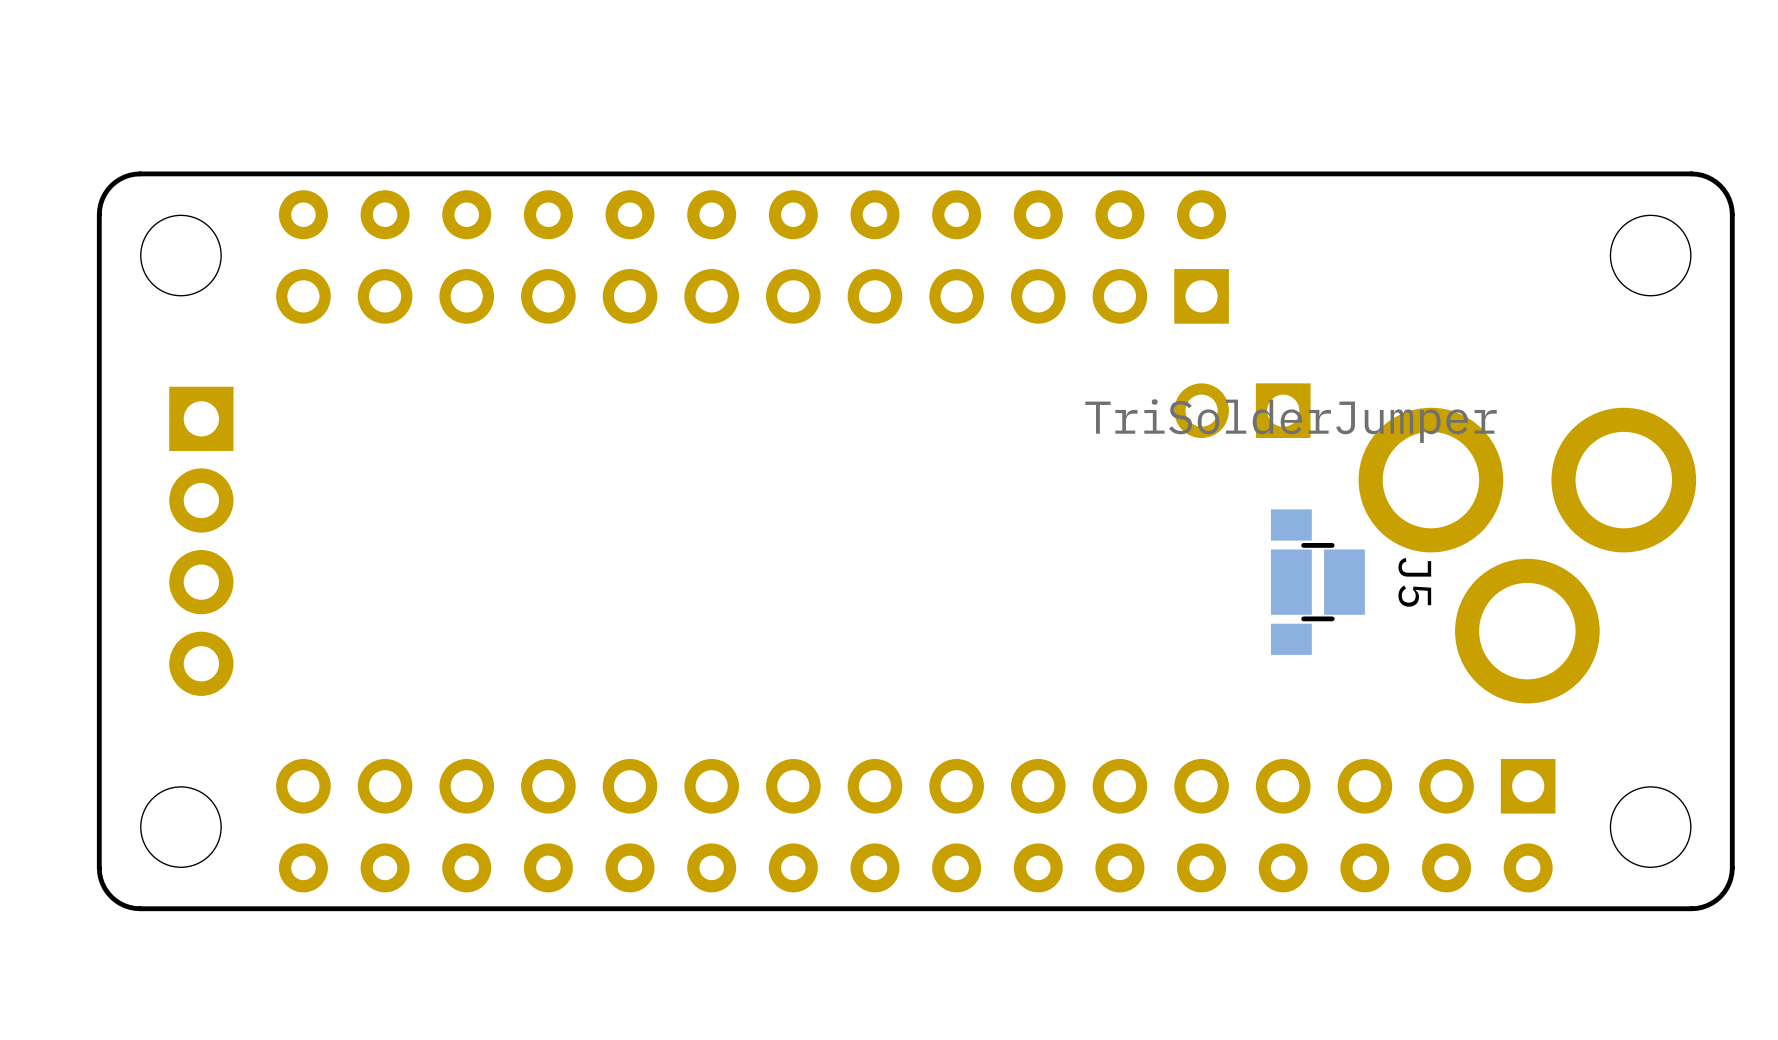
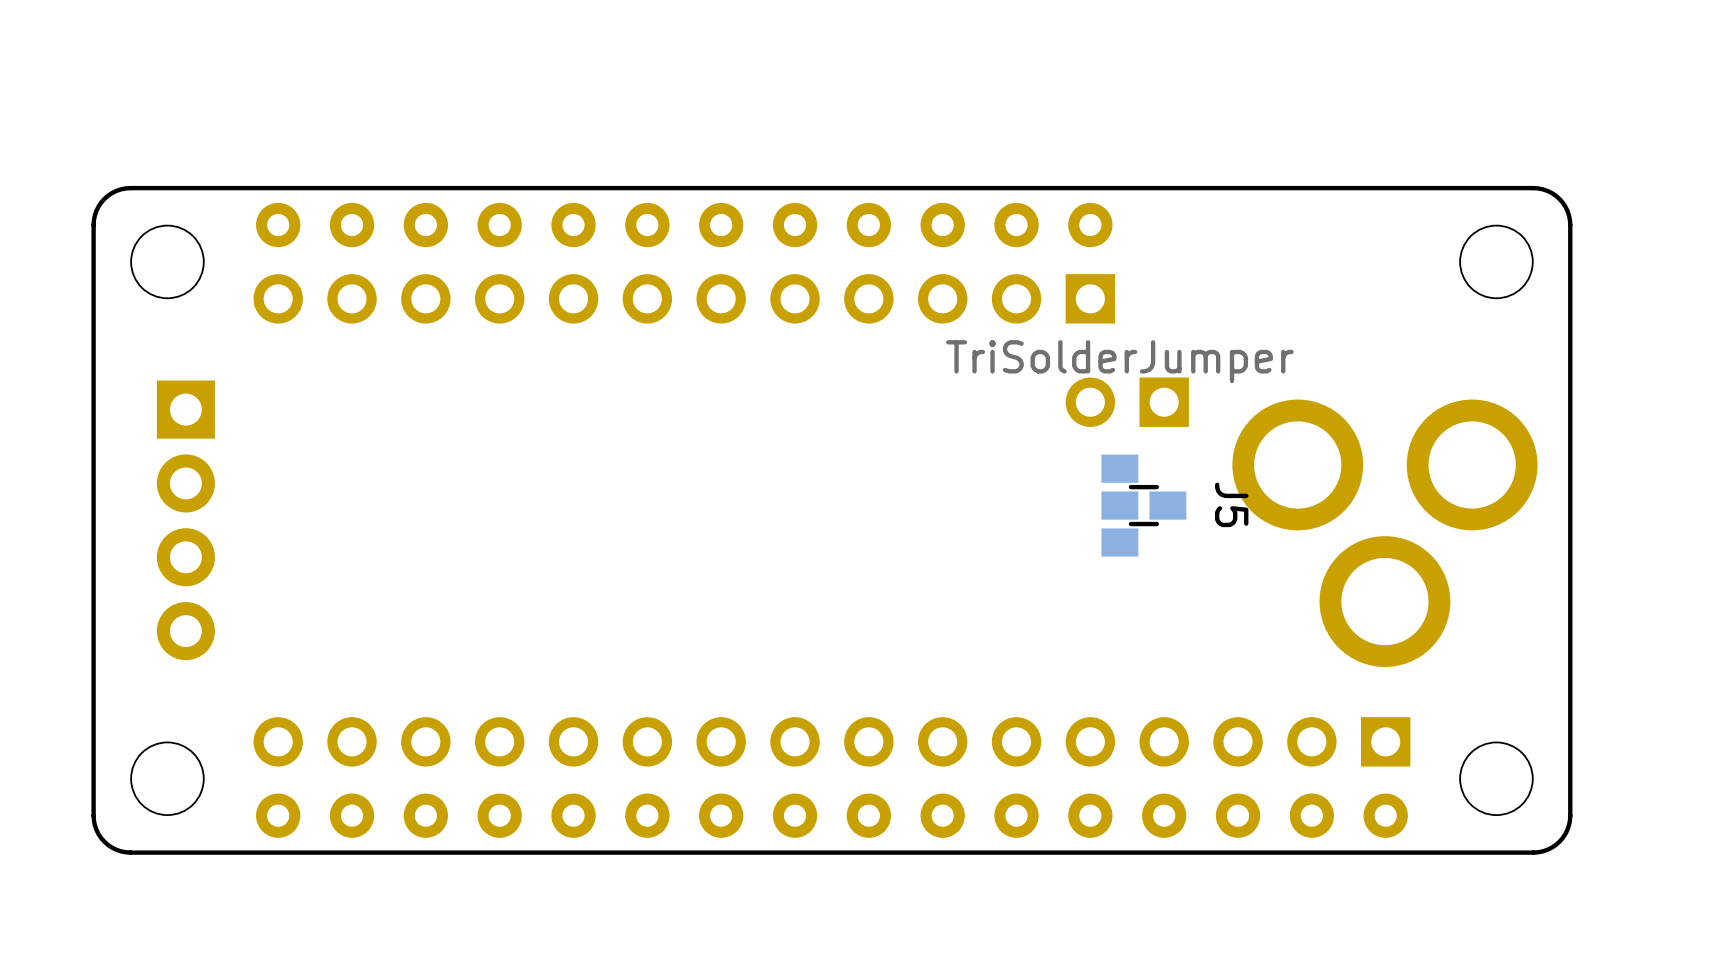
J5 footprint: [1270, 509, 1365, 655] -> [1101, 454, 1187, 557]

